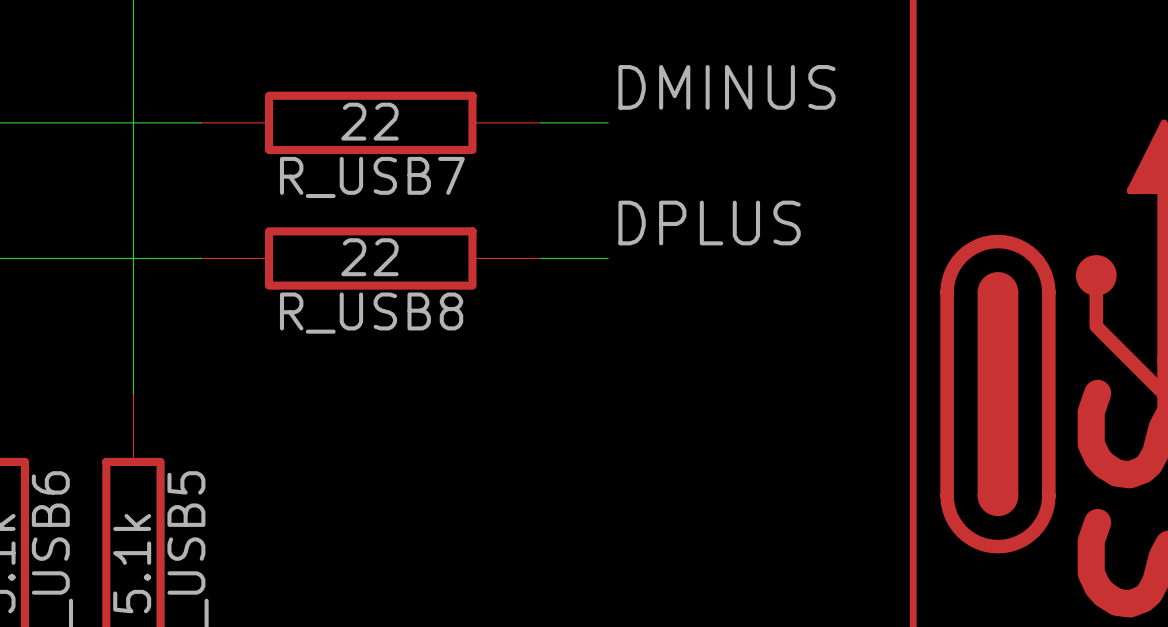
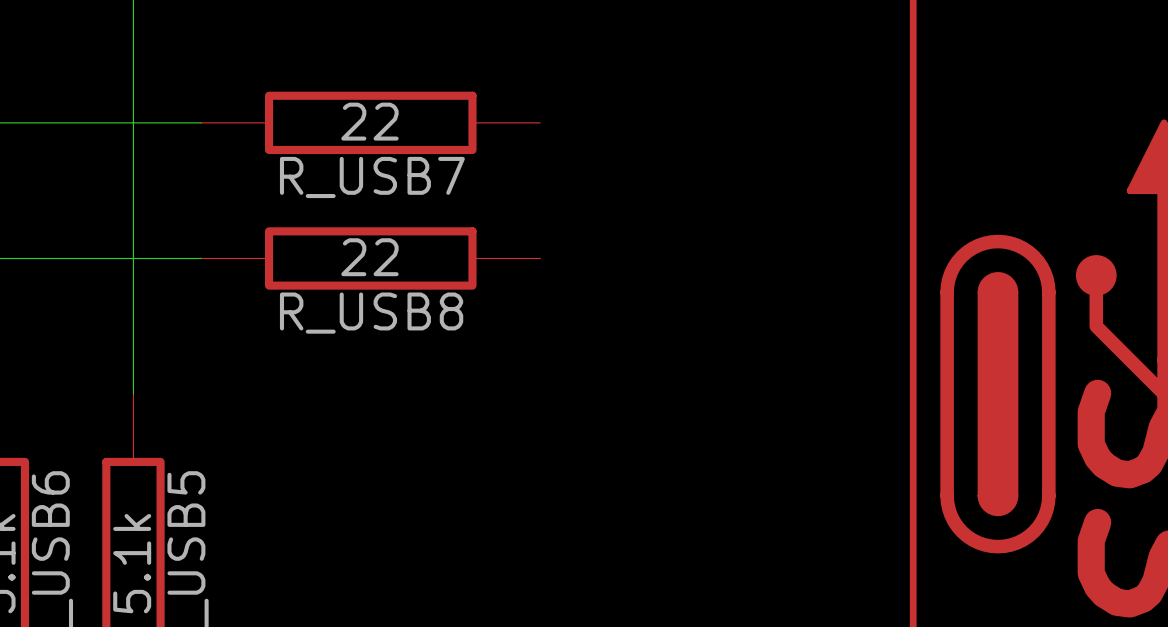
label: DMINUS (727, 87) -> none
wire: (540, 122) (608, 122) -> none
label: DPLUS (709, 223) -> none
wire: (540, 258) (608, 258) -> none

